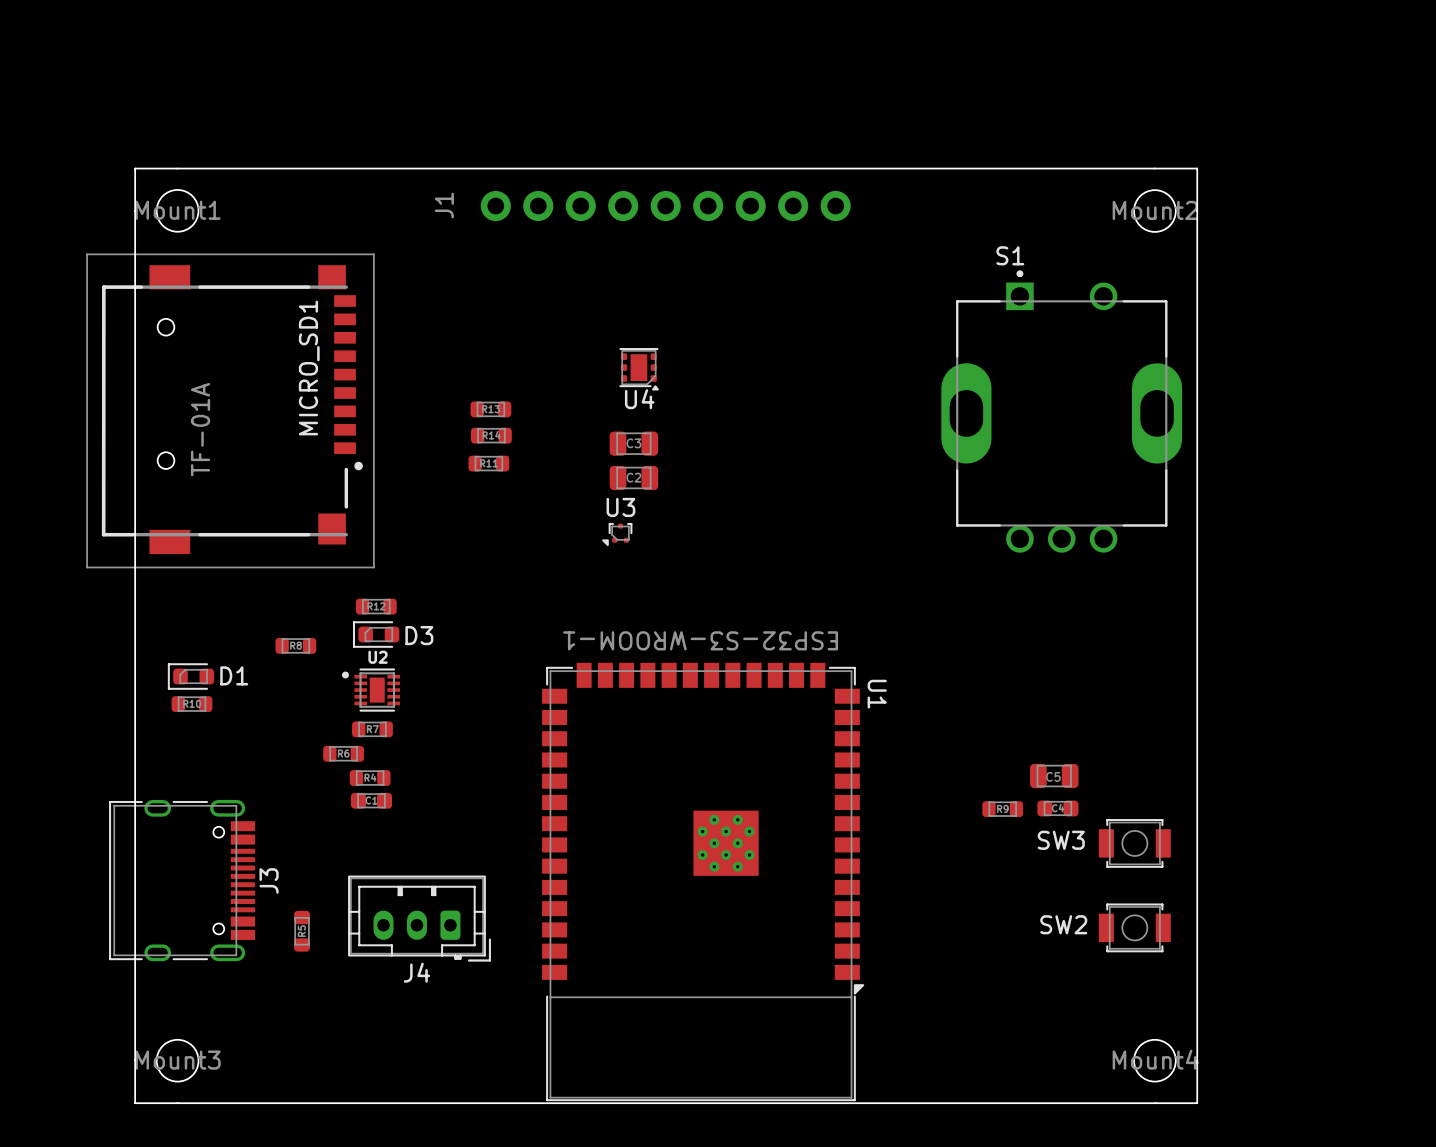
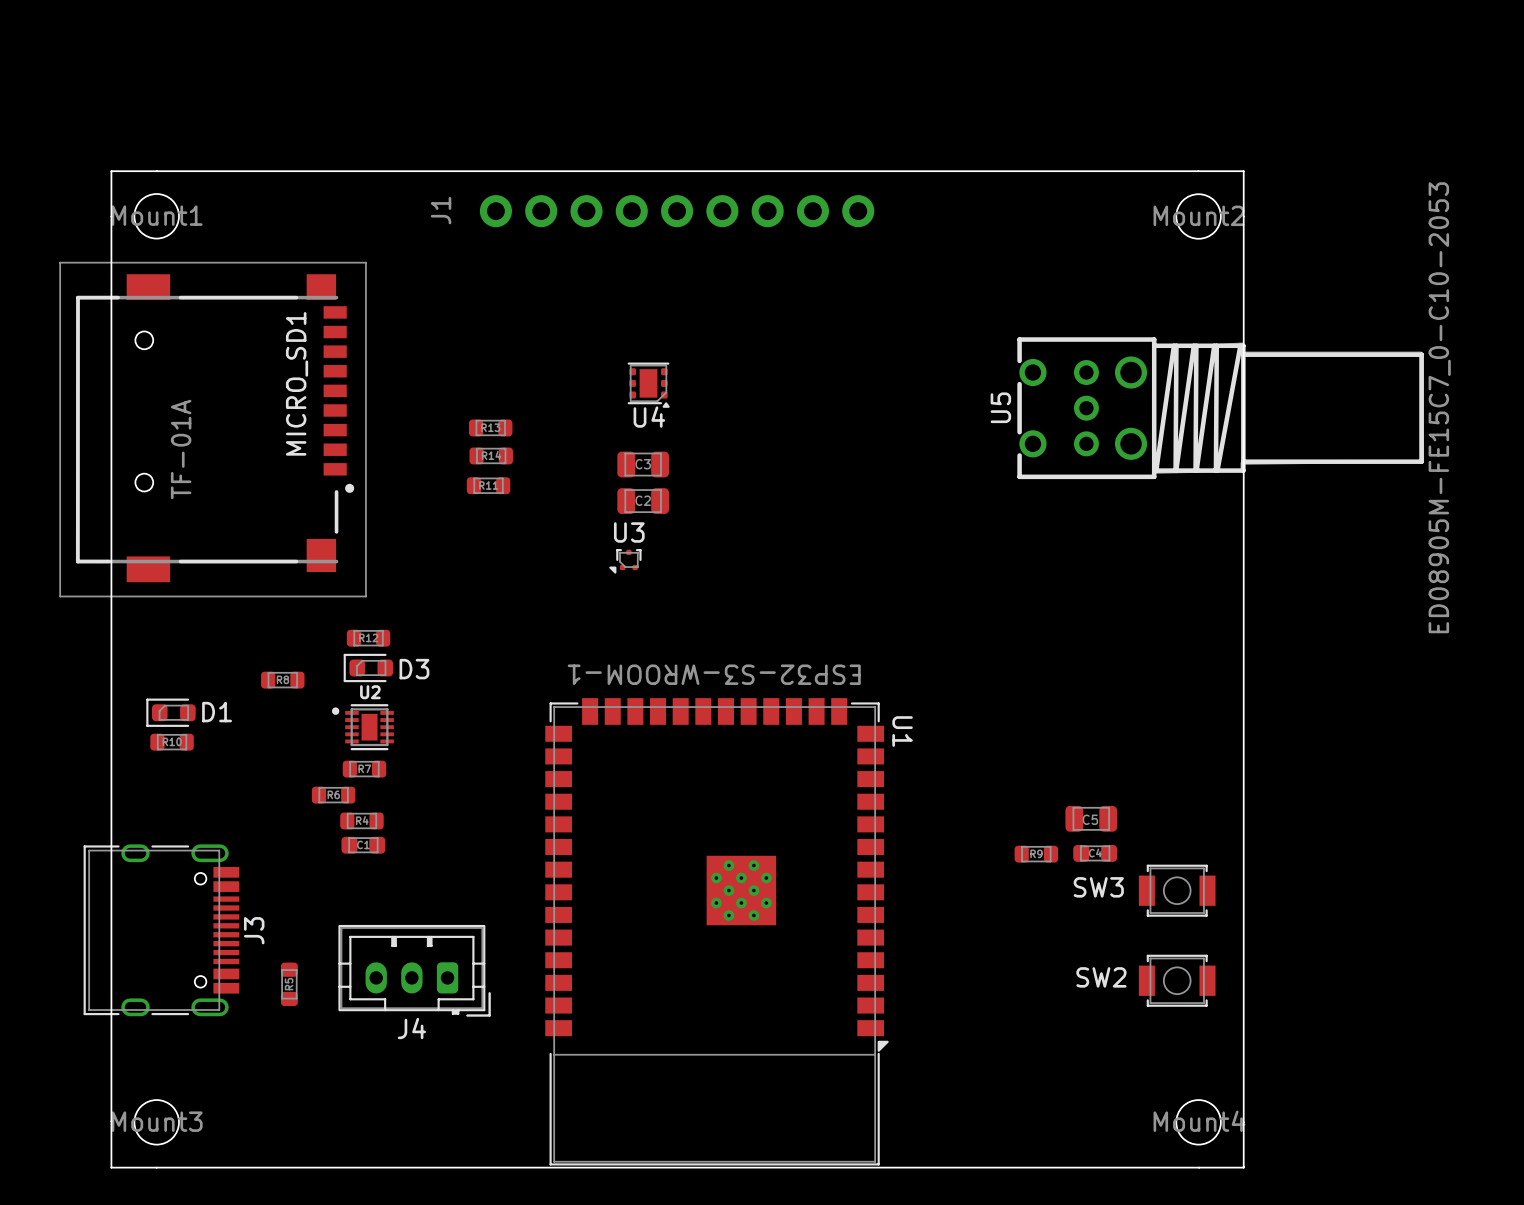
U5: none -> ED08905M-FE15C7_0-C10-2053 (1220, 408)
S1: (1061, 411) -> none

